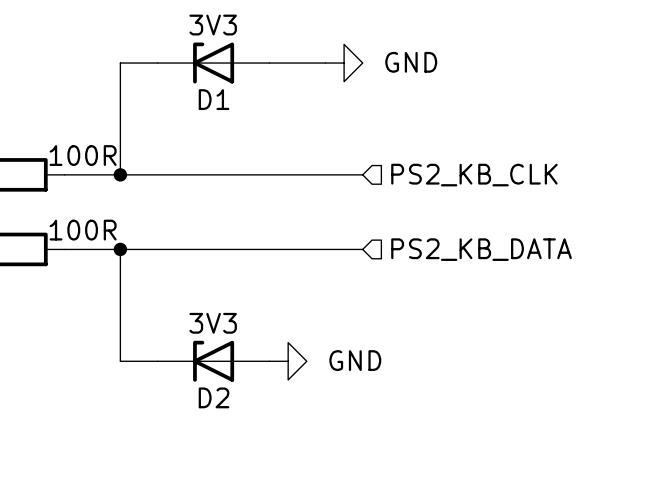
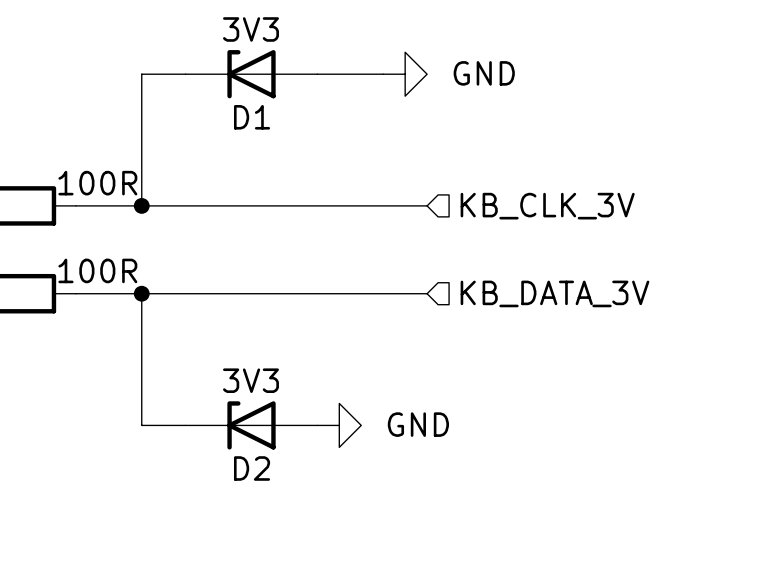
hierarchical label: PS2_KB_CLK (474, 175) -> KB_CLK_3V (547, 206)
hierarchical label: PS2_KB_DATA (481, 249) -> KB_DATA_3V (554, 293)

